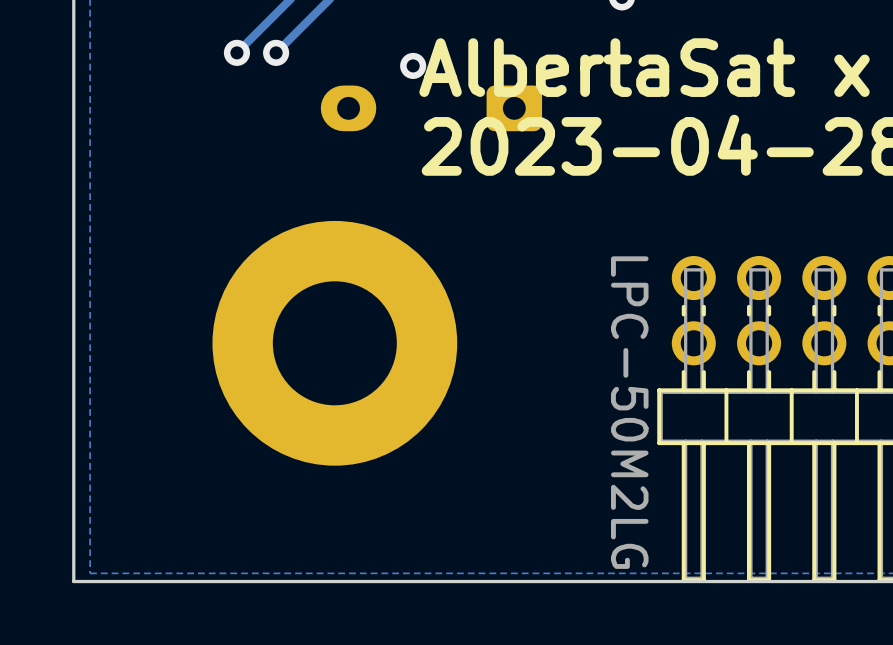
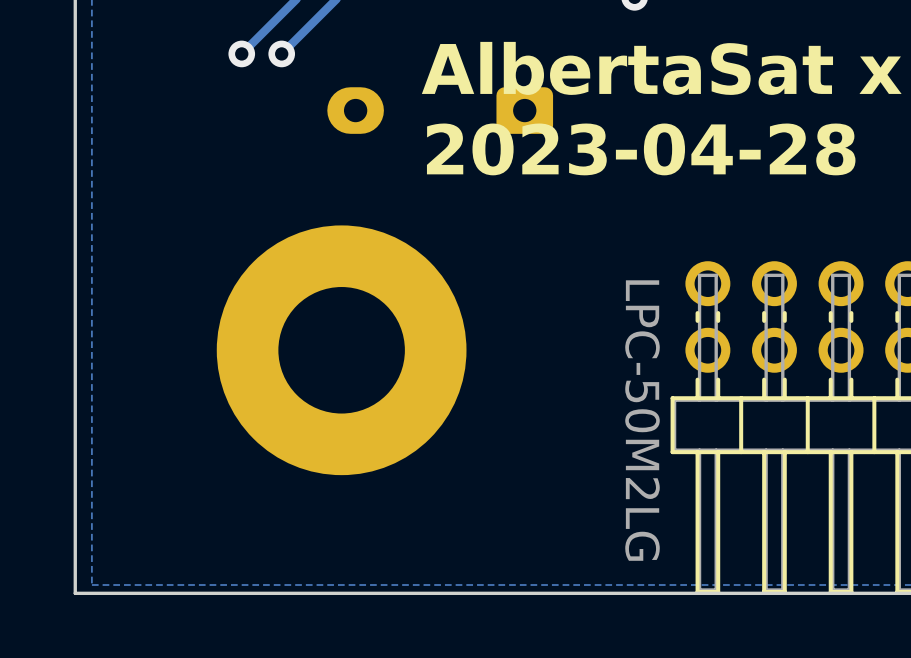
via: (413, 65) -> none

